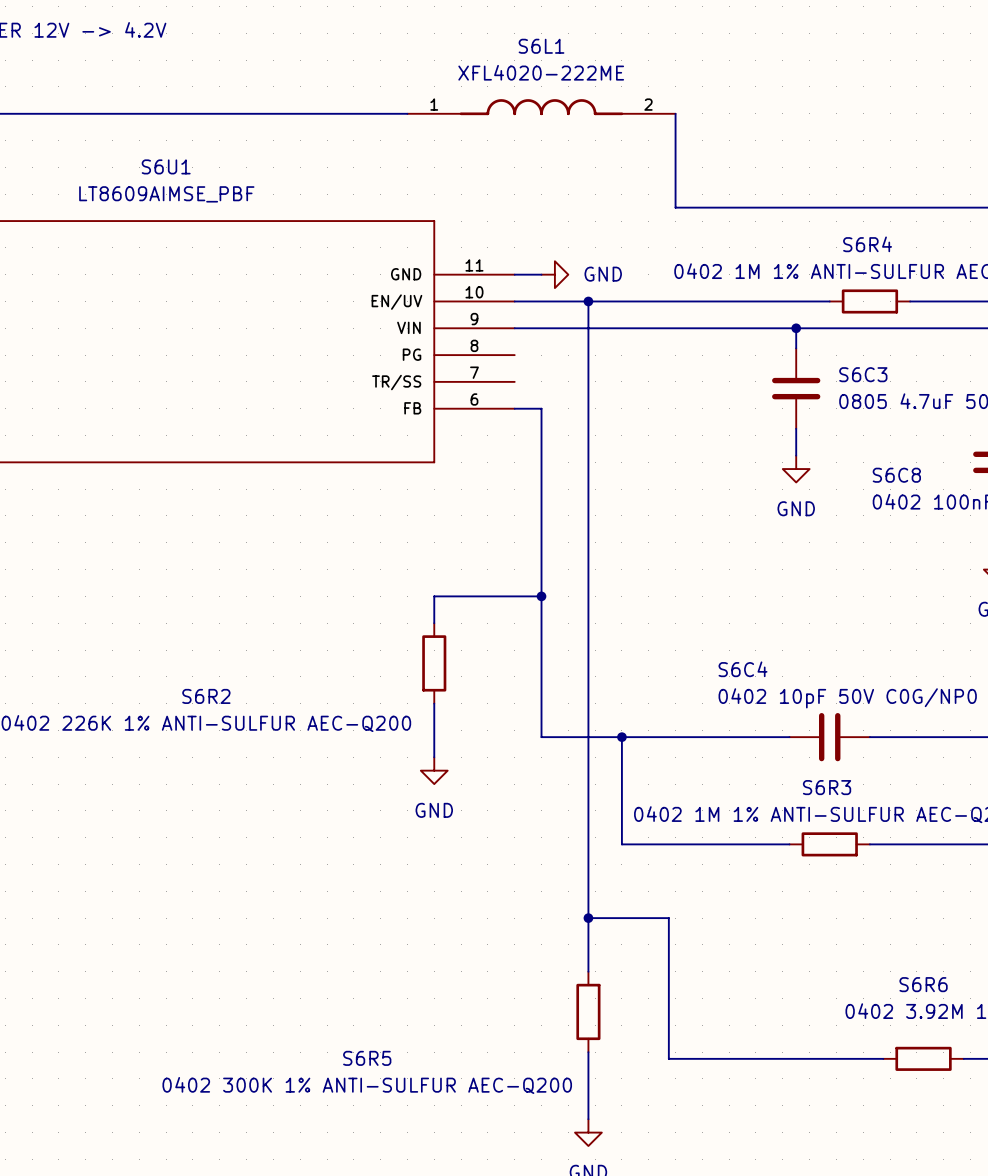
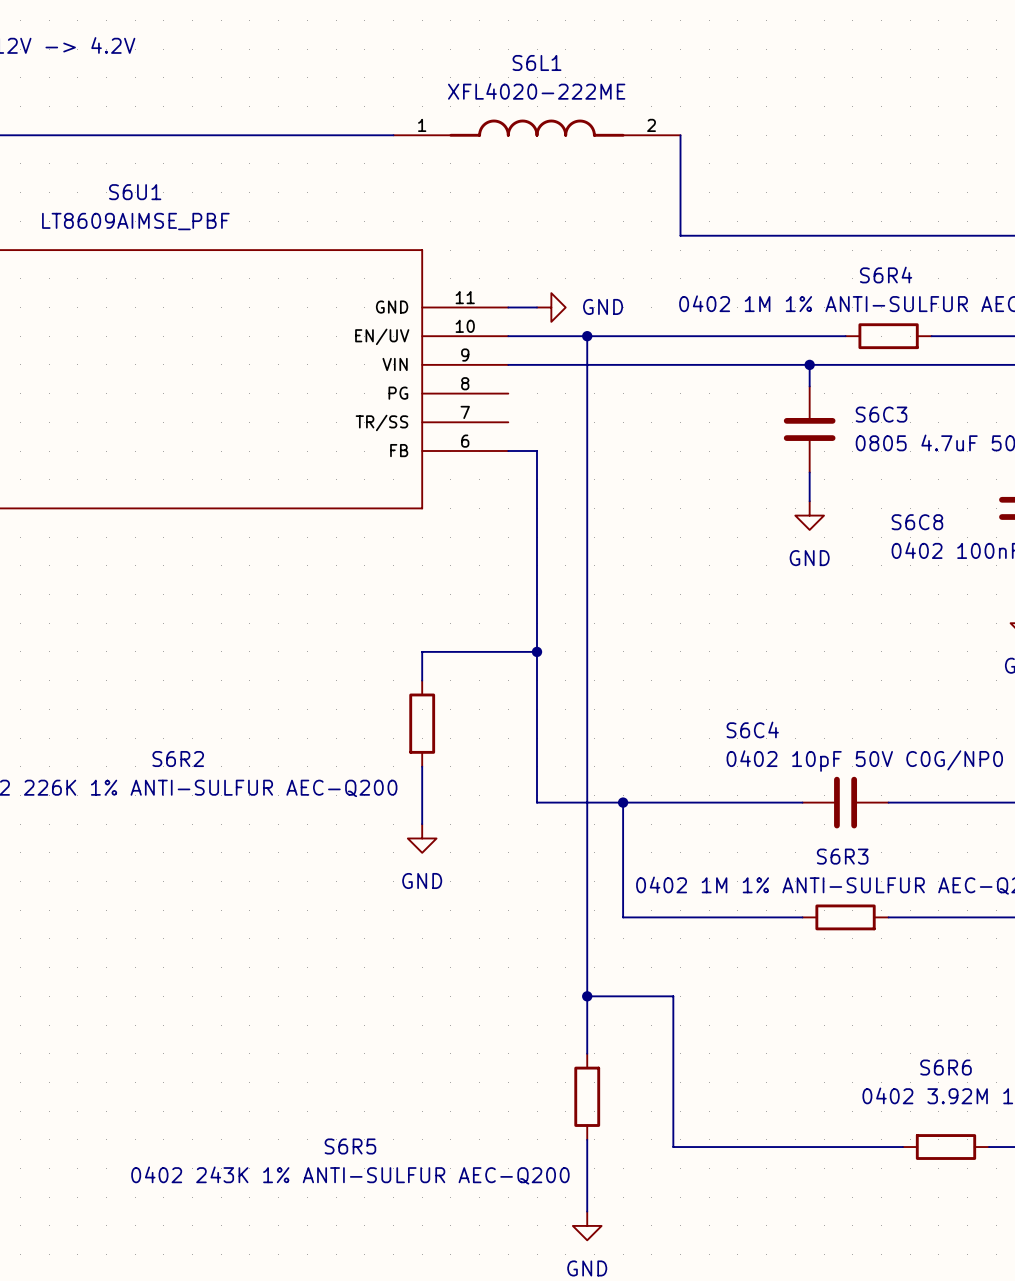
S6R5 value: 0402 300K 1% ANTI-SULFUR AEC-Q200 (367, 1085) -> 0402 243K 1% ANTI-SULFUR AEC-Q200 (350, 1175)

